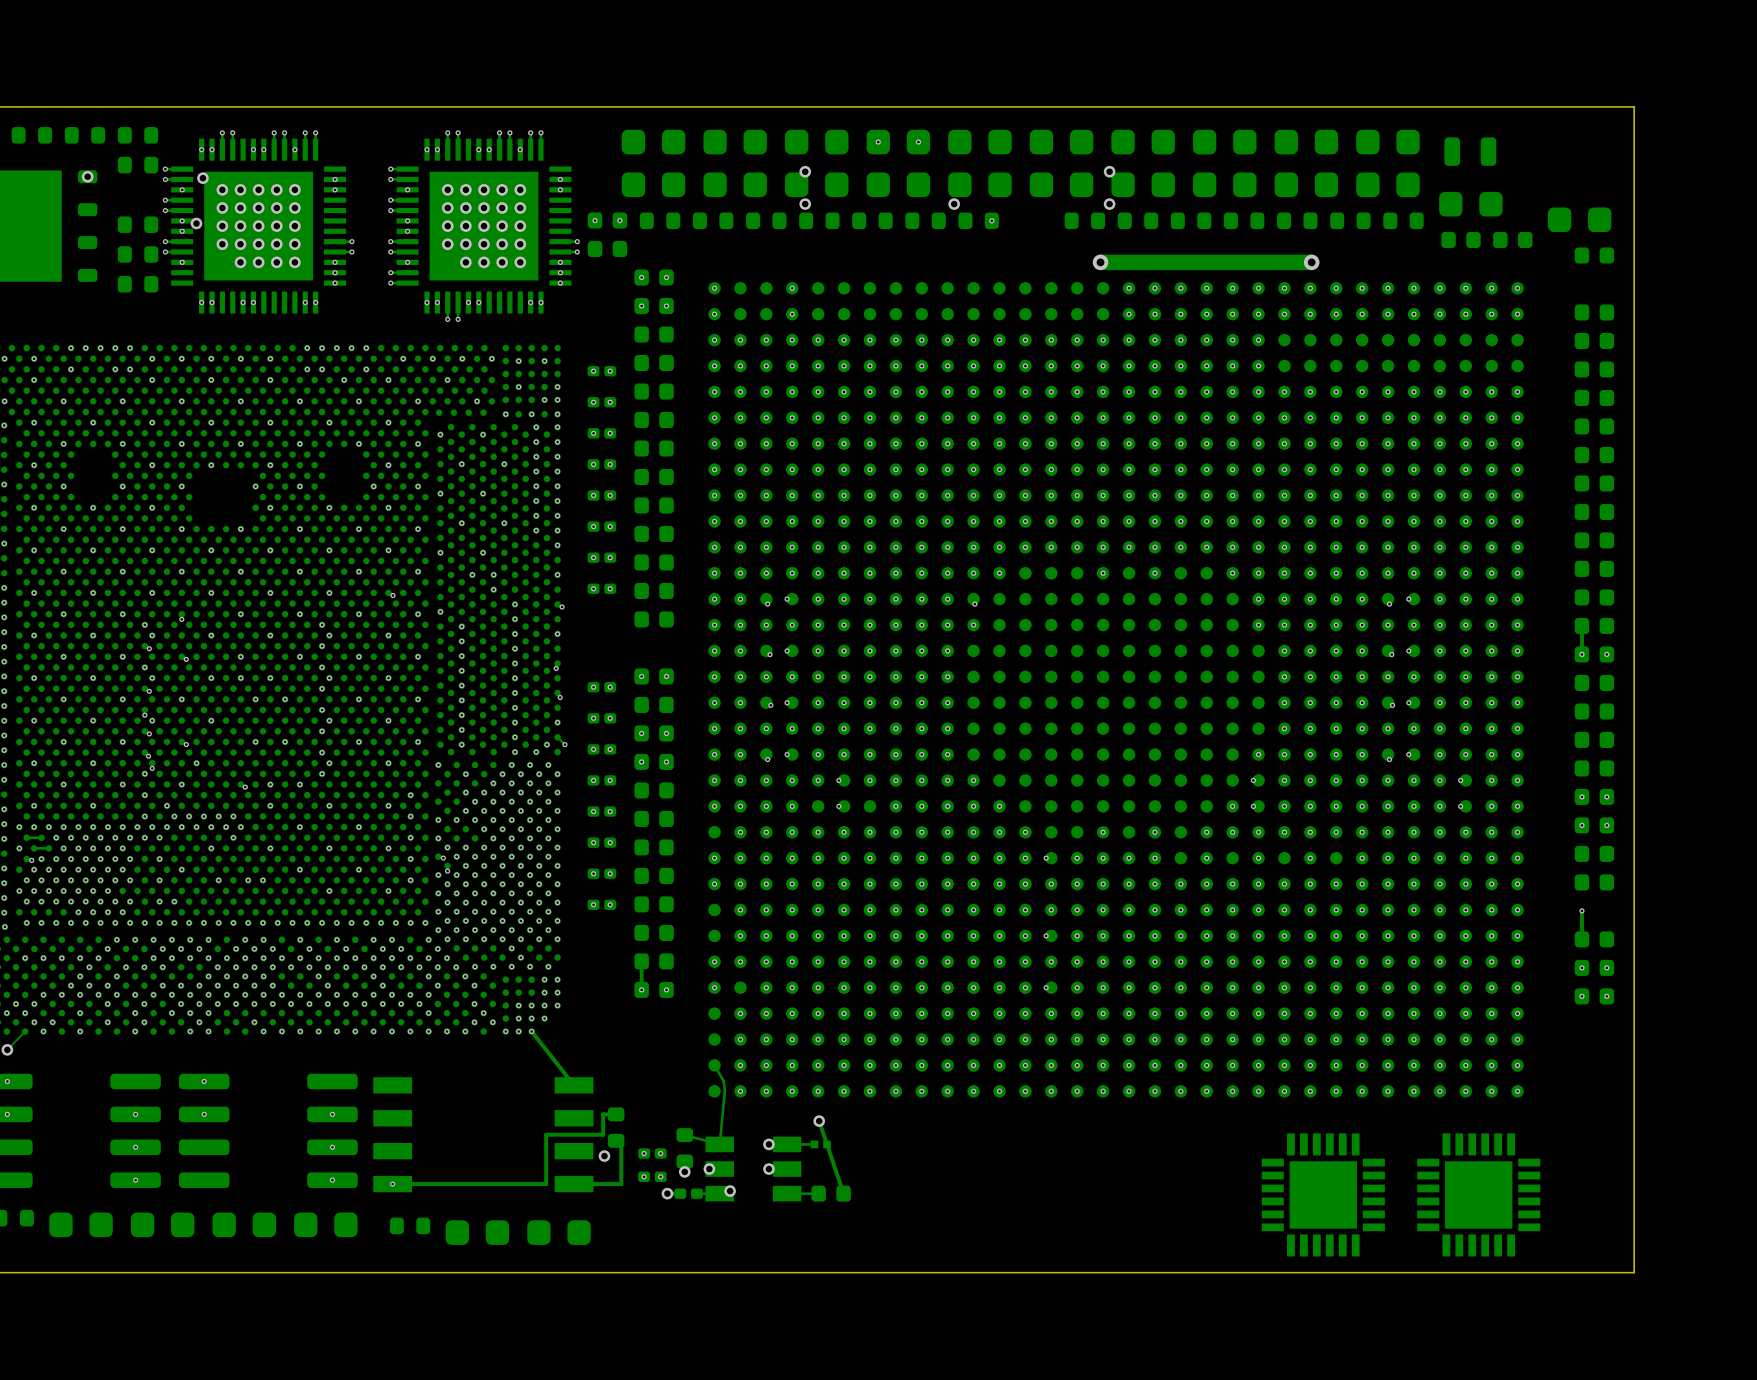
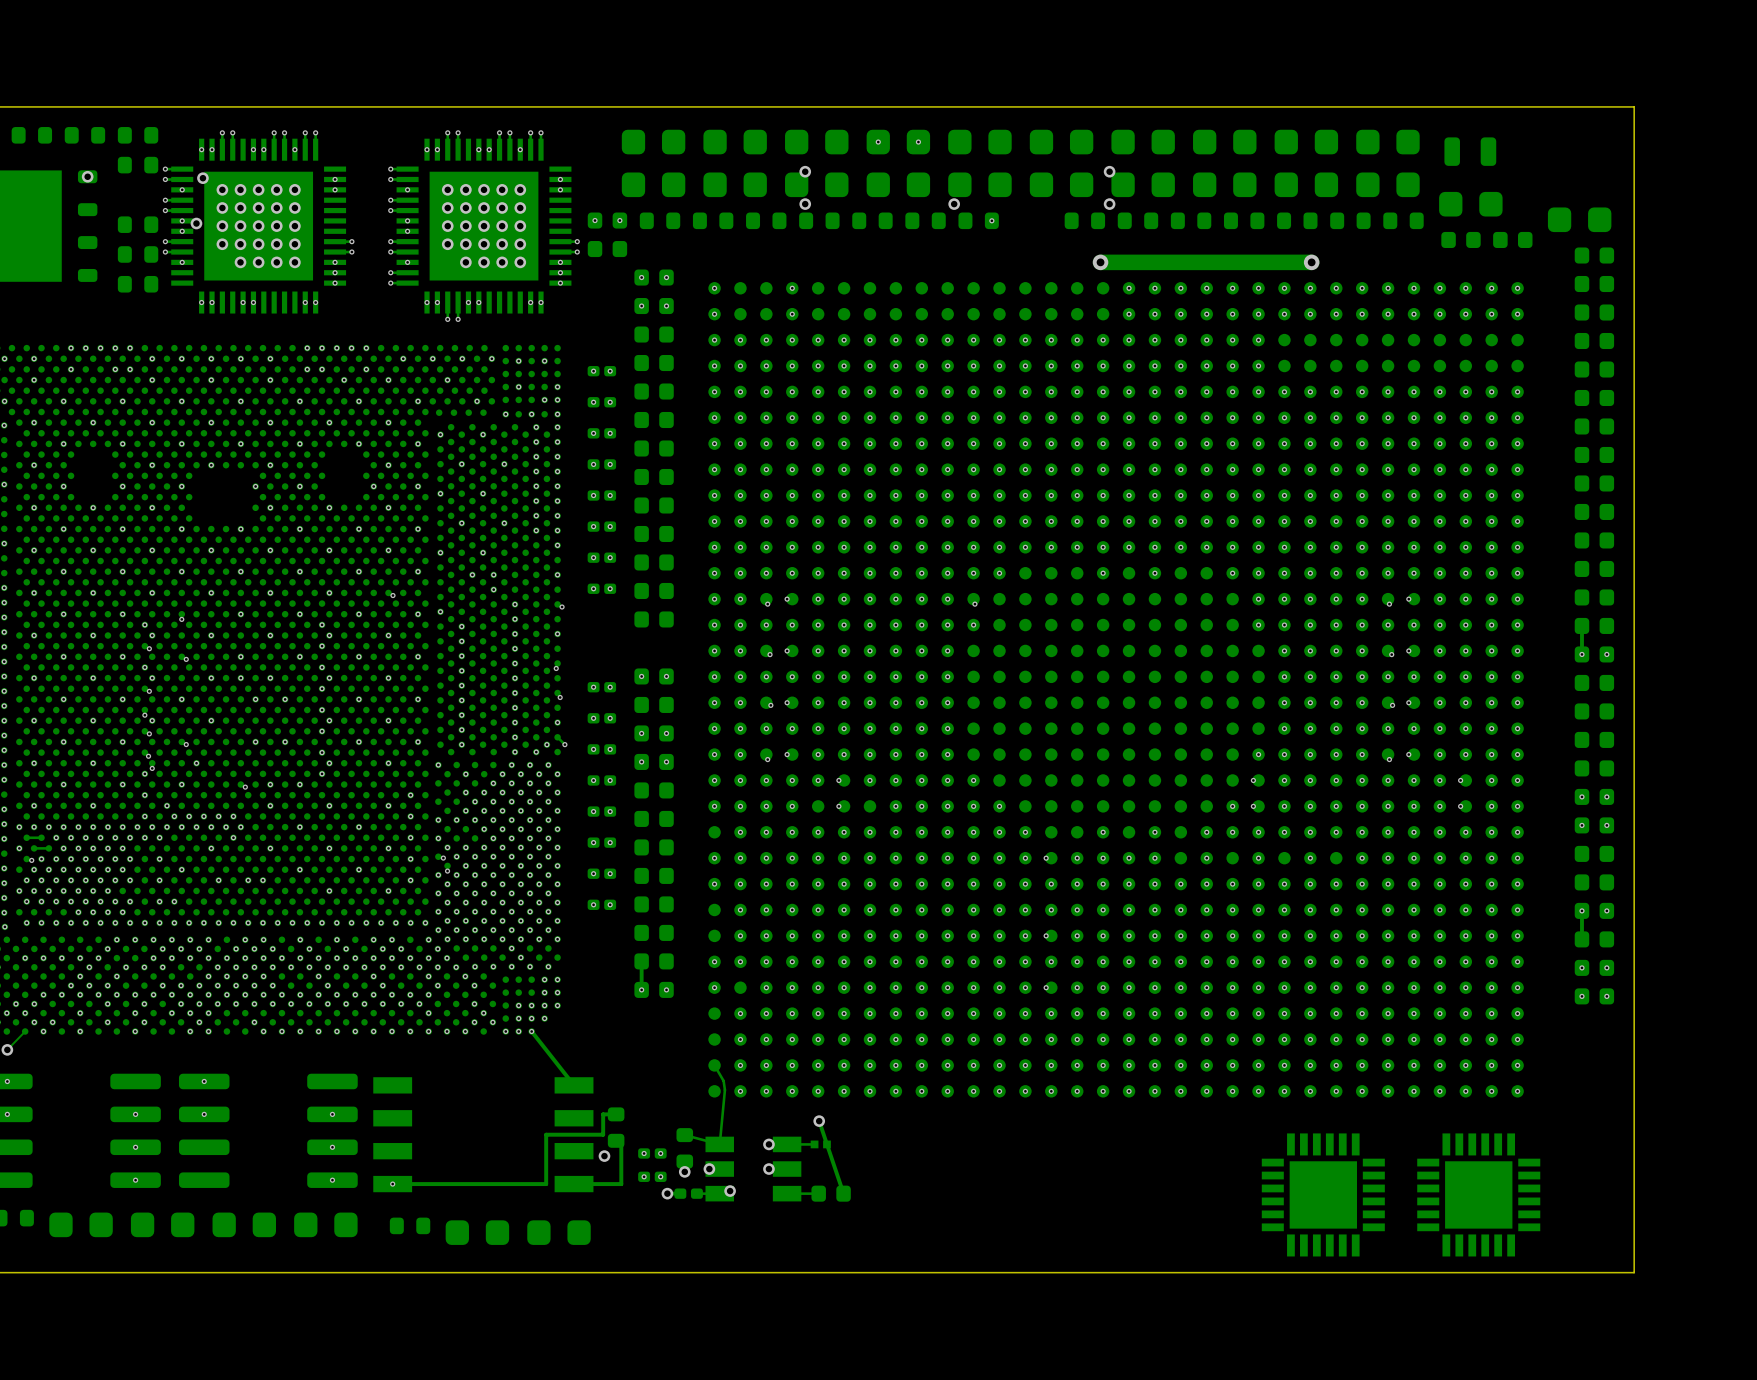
part: none -> (1594, 284)
part: none -> (1594, 910)
via: none -> (1606, 910)

